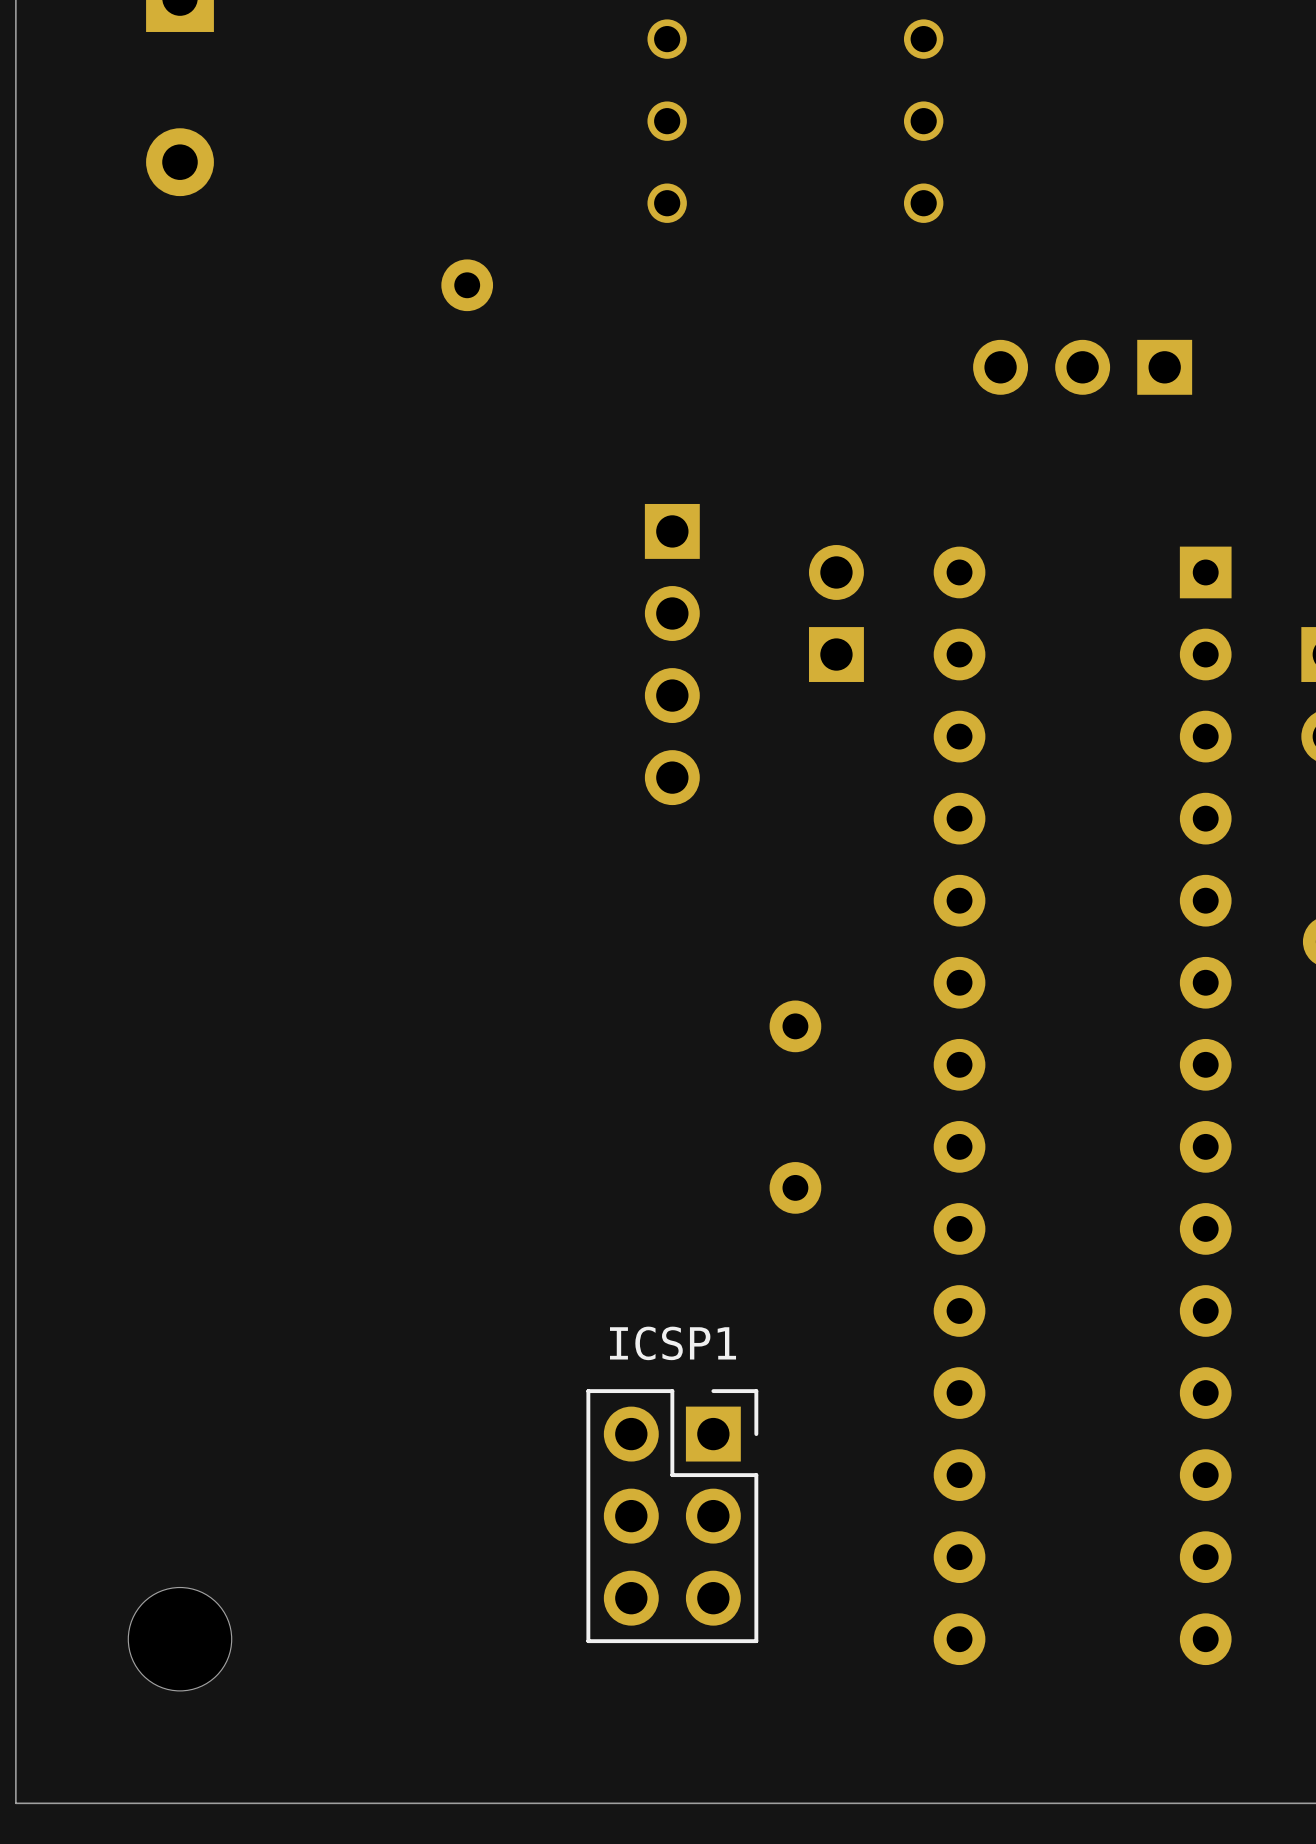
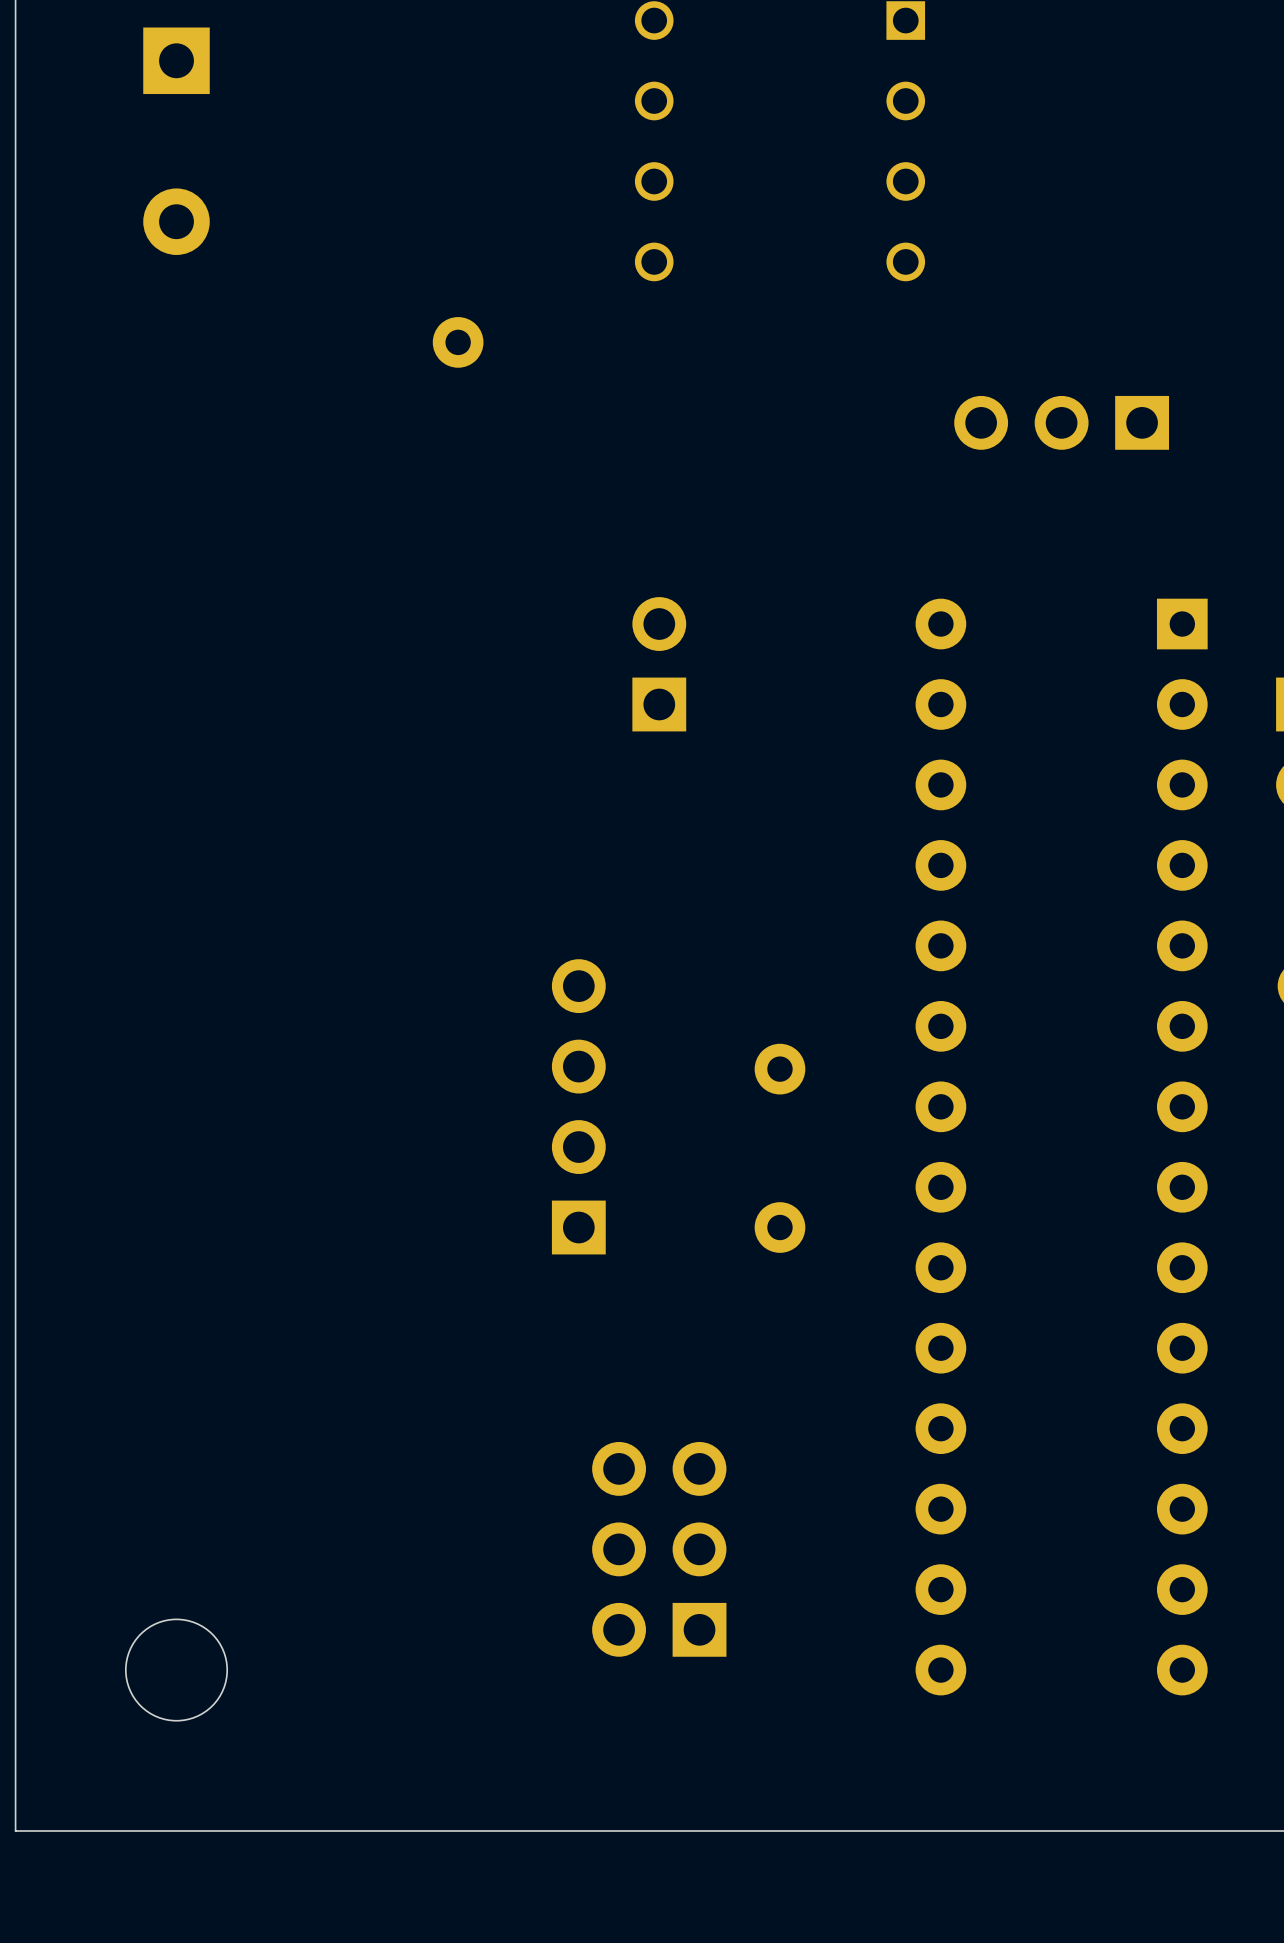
part position: (836, 613) -> (659, 664)
part rotation: 0° (672, 654) -> 180° (578, 1106)
part position: (672, 654) -> (578, 1106)
ICSP1 side: bottom (672, 1516) -> top (659, 1549)

